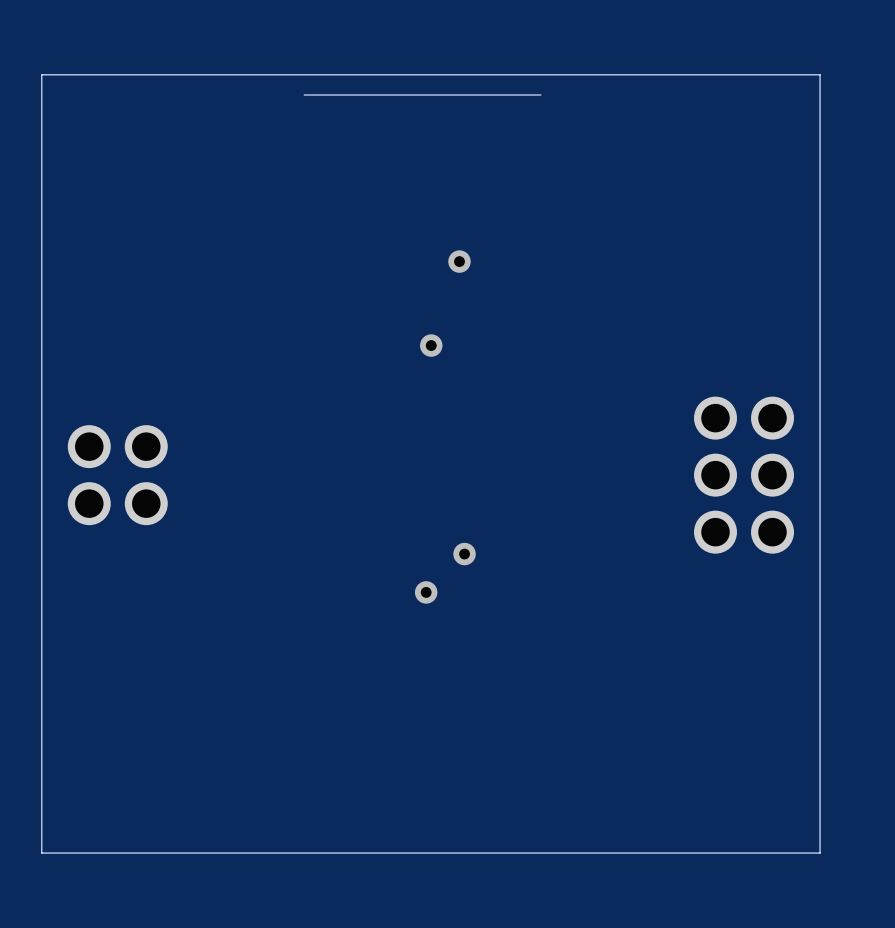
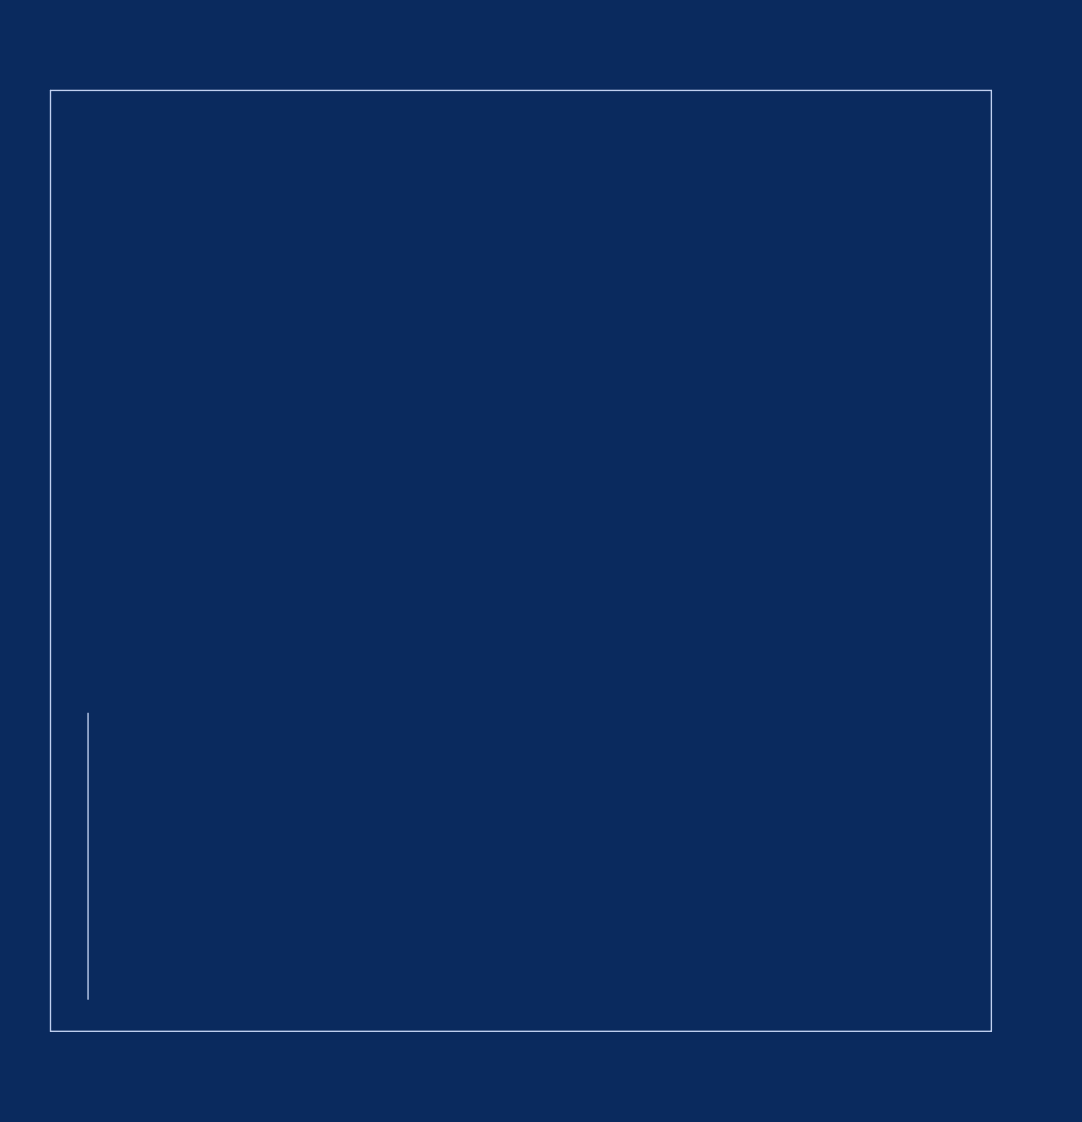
part rotation: 0° (422, 95) -> 90° clockwise (88, 856)
part position: (422, 95) -> (88, 856)
via: (459, 261) -> none
via: (431, 345) -> none
part: (117, 475) -> none
part: (744, 475) -> none
via: (464, 554) -> none
via: (426, 592) -> none

